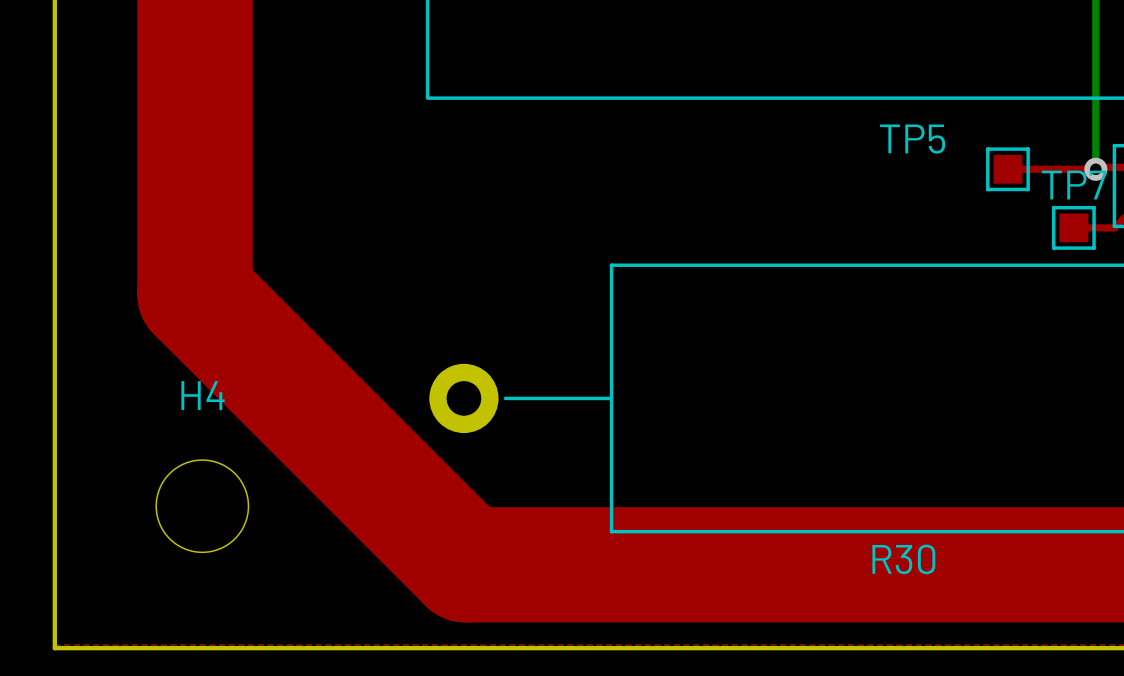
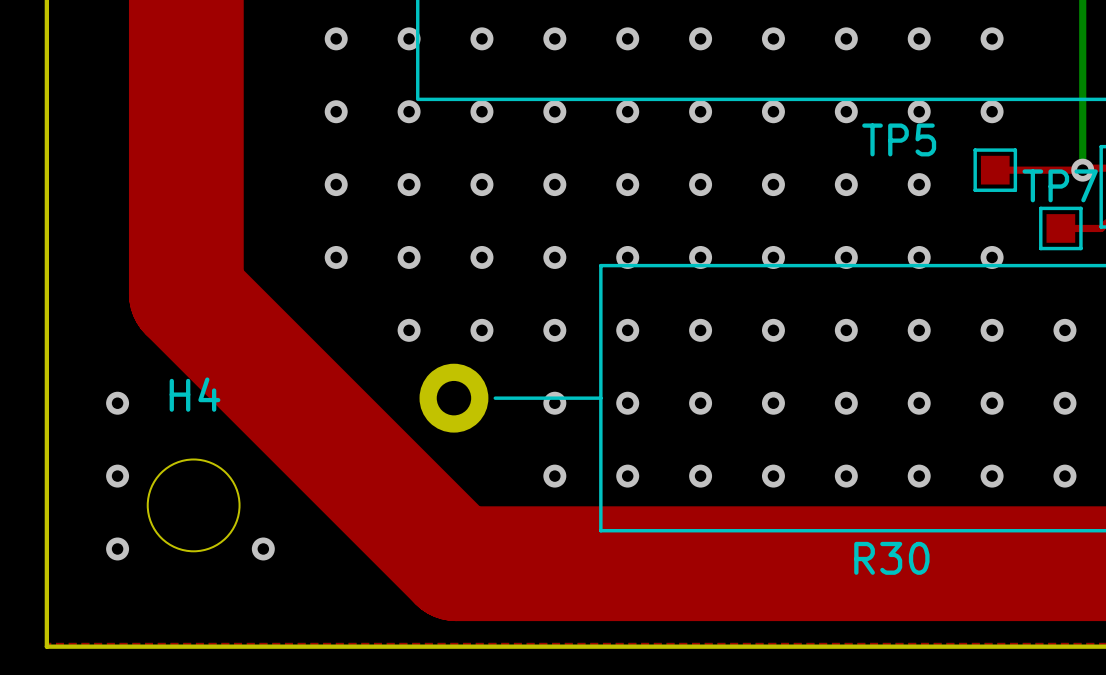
via: none -> (336, 38)
via: none -> (409, 38)
via: none -> (481, 38)
via: none -> (554, 38)
via: none -> (627, 38)
via: none -> (700, 38)
via: none -> (773, 38)
via: none -> (846, 38)
via: none -> (919, 38)
via: none -> (992, 38)
via: none -> (336, 111)
via: none -> (409, 111)
via: none -> (481, 111)
via: none -> (554, 111)
via: none -> (627, 111)
via: none -> (700, 111)
via: none -> (773, 111)
via: none -> (846, 111)
via: none -> (919, 111)
via: none -> (992, 111)
via: none -> (336, 184)
via: none -> (409, 184)
via: none -> (481, 184)
via: none -> (554, 184)
via: none -> (627, 184)
via: none -> (700, 184)
via: none -> (773, 184)
via: none -> (846, 184)
via: none -> (919, 184)
via: none -> (336, 257)
via: none -> (409, 257)
via: none -> (481, 257)
via: none -> (554, 257)
via: none -> (627, 257)
via: none -> (700, 257)
via: none -> (773, 257)
via: none -> (846, 257)
via: none -> (919, 257)
via: none -> (992, 257)
via: none -> (409, 330)
via: none -> (481, 330)
via: none -> (554, 330)
via: none -> (627, 330)
via: none -> (700, 330)
via: none -> (773, 330)
via: none -> (846, 330)
via: none -> (919, 330)
via: none -> (992, 330)
via: none -> (1064, 330)
via: none -> (117, 403)
via: none -> (554, 403)
via: none -> (627, 403)
via: none -> (700, 403)
via: none -> (773, 403)
via: none -> (846, 403)
via: none -> (919, 403)
via: none -> (992, 403)
via: none -> (1064, 403)
via: none -> (117, 476)
via: none -> (554, 476)
via: none -> (627, 476)
via: none -> (700, 476)
via: none -> (773, 476)
via: none -> (846, 476)
via: none -> (919, 476)
via: none -> (992, 476)
via: none -> (1064, 476)
via: none -> (117, 548)
via: none -> (263, 548)

